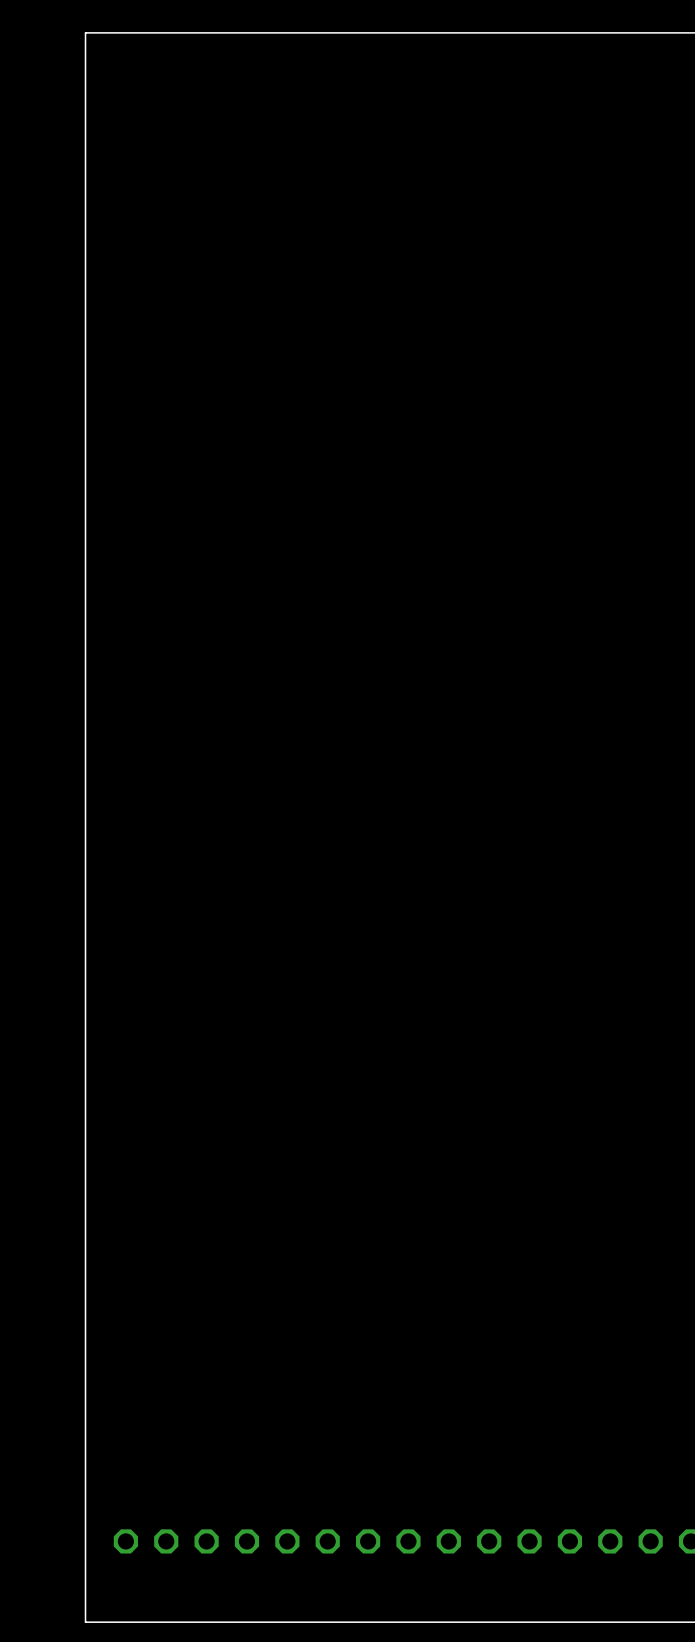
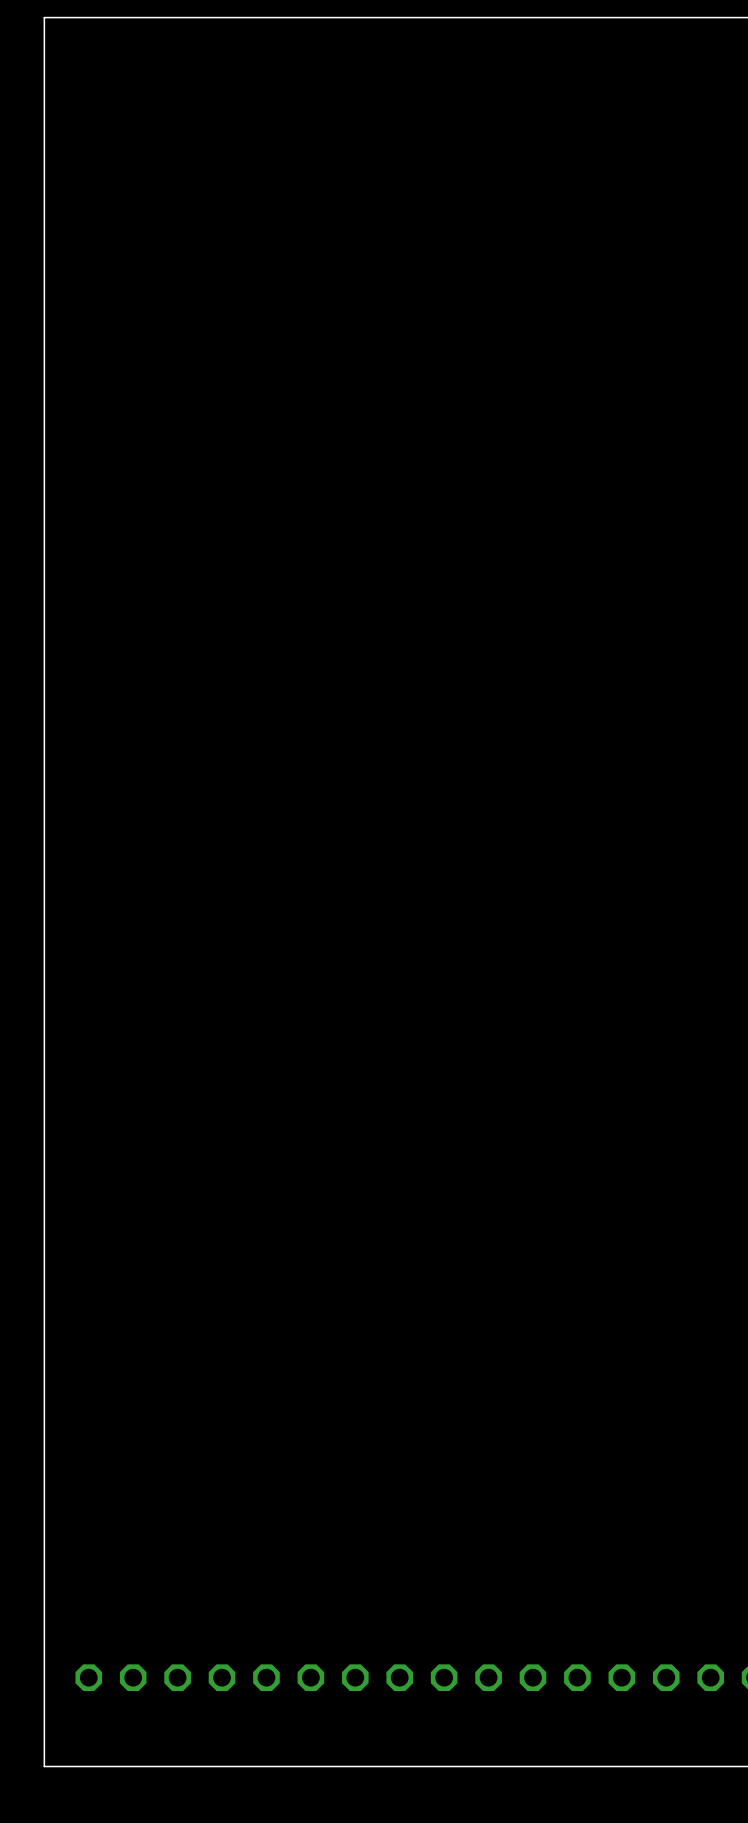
board edge: (85, 32) (85, 1622) -> (88, 17) (44, 17) (44, 1766) (88, 1766)
part: none -> (88, 1677)

